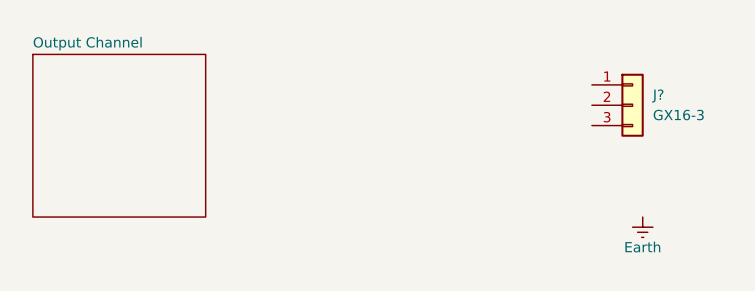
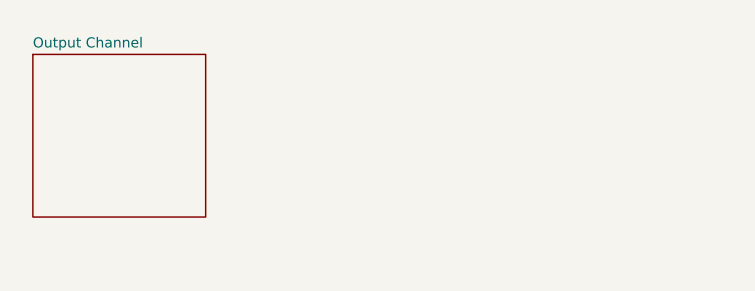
J?: GX16-3 (617, 105) -> none
power symbol: Earth (642, 227) -> none

